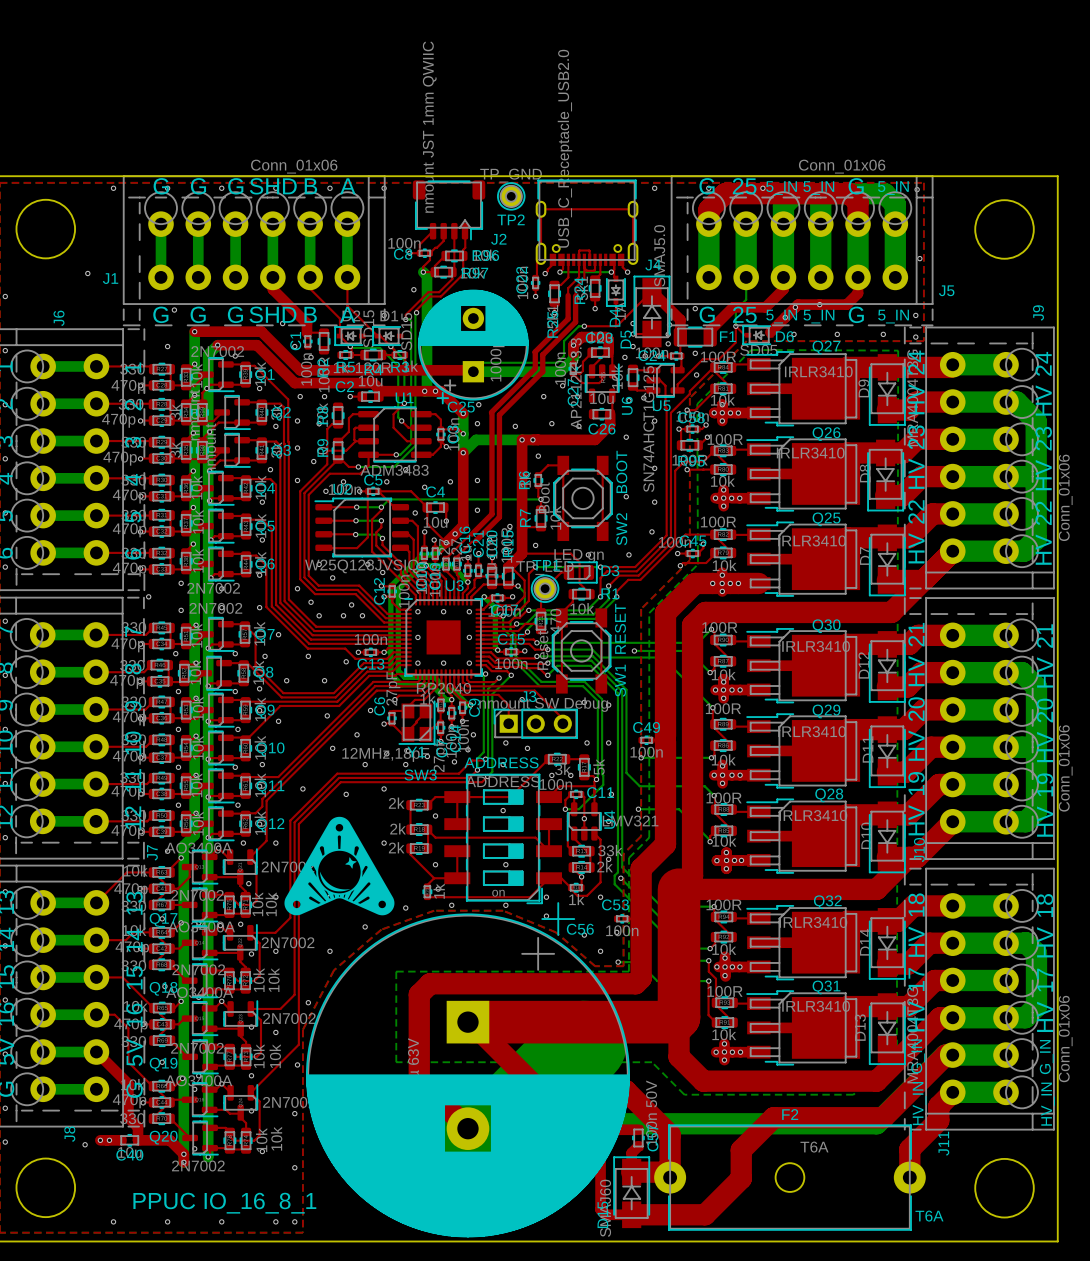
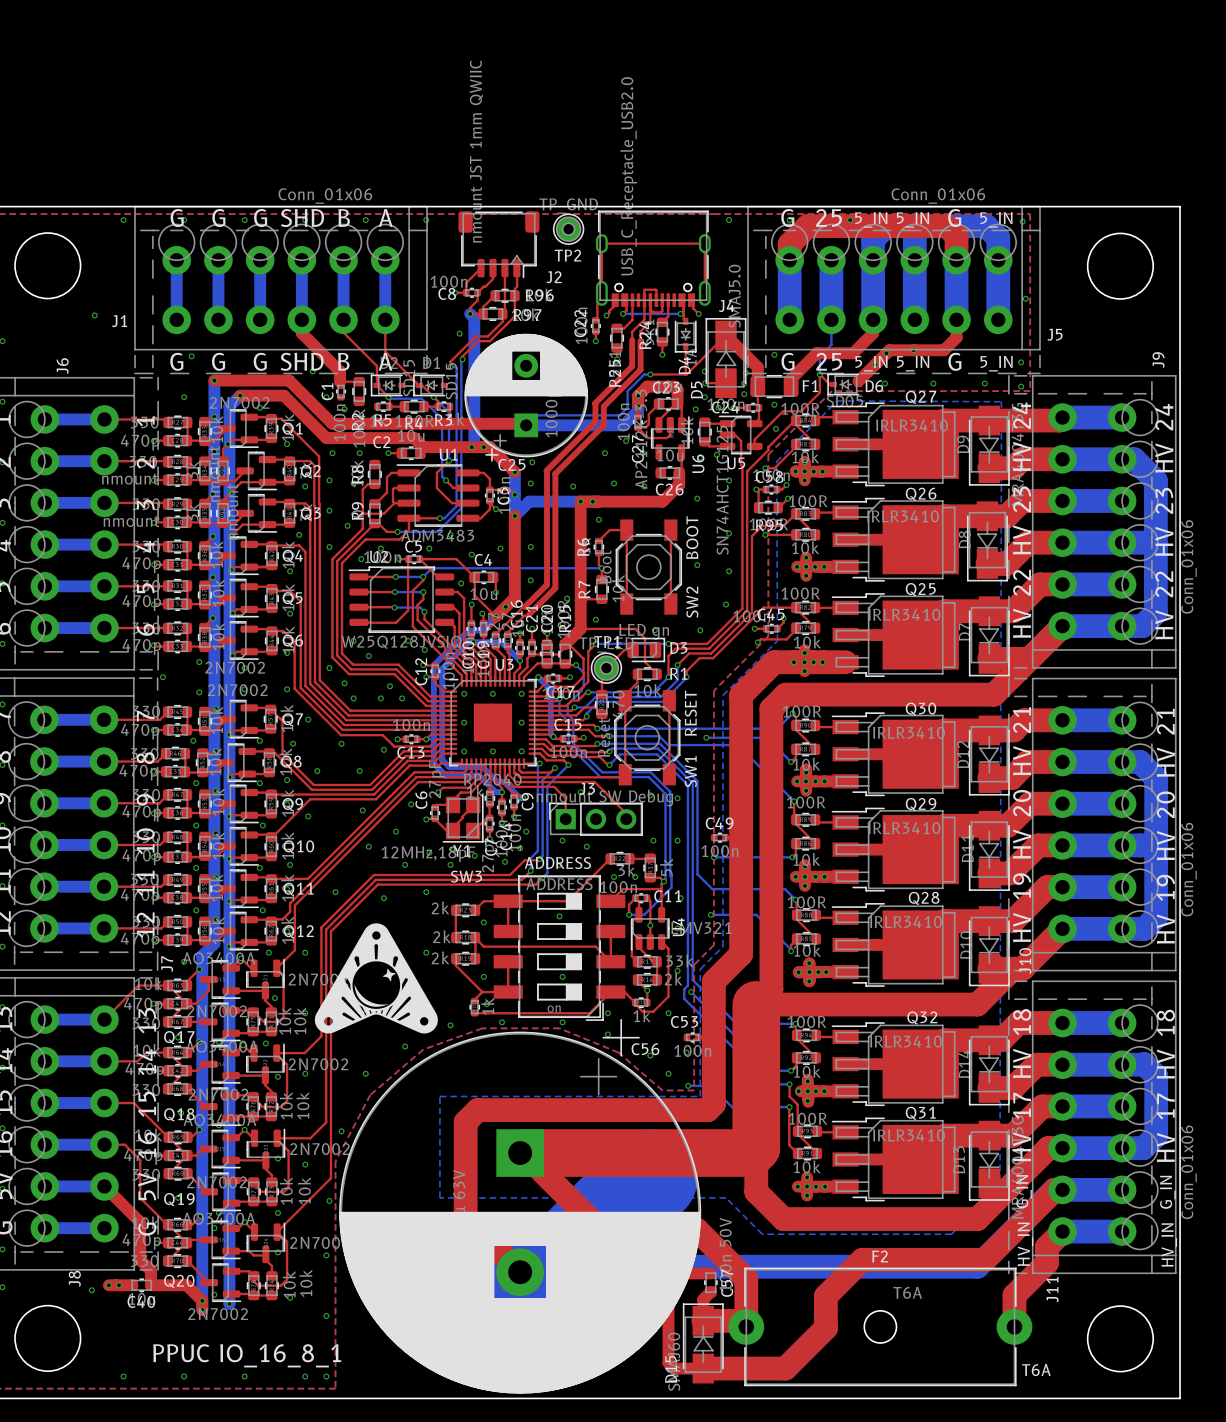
part value: 470p (118, 420) -> nmount (130, 478)
part value: 470p (120, 458) -> nmount (131, 521)

